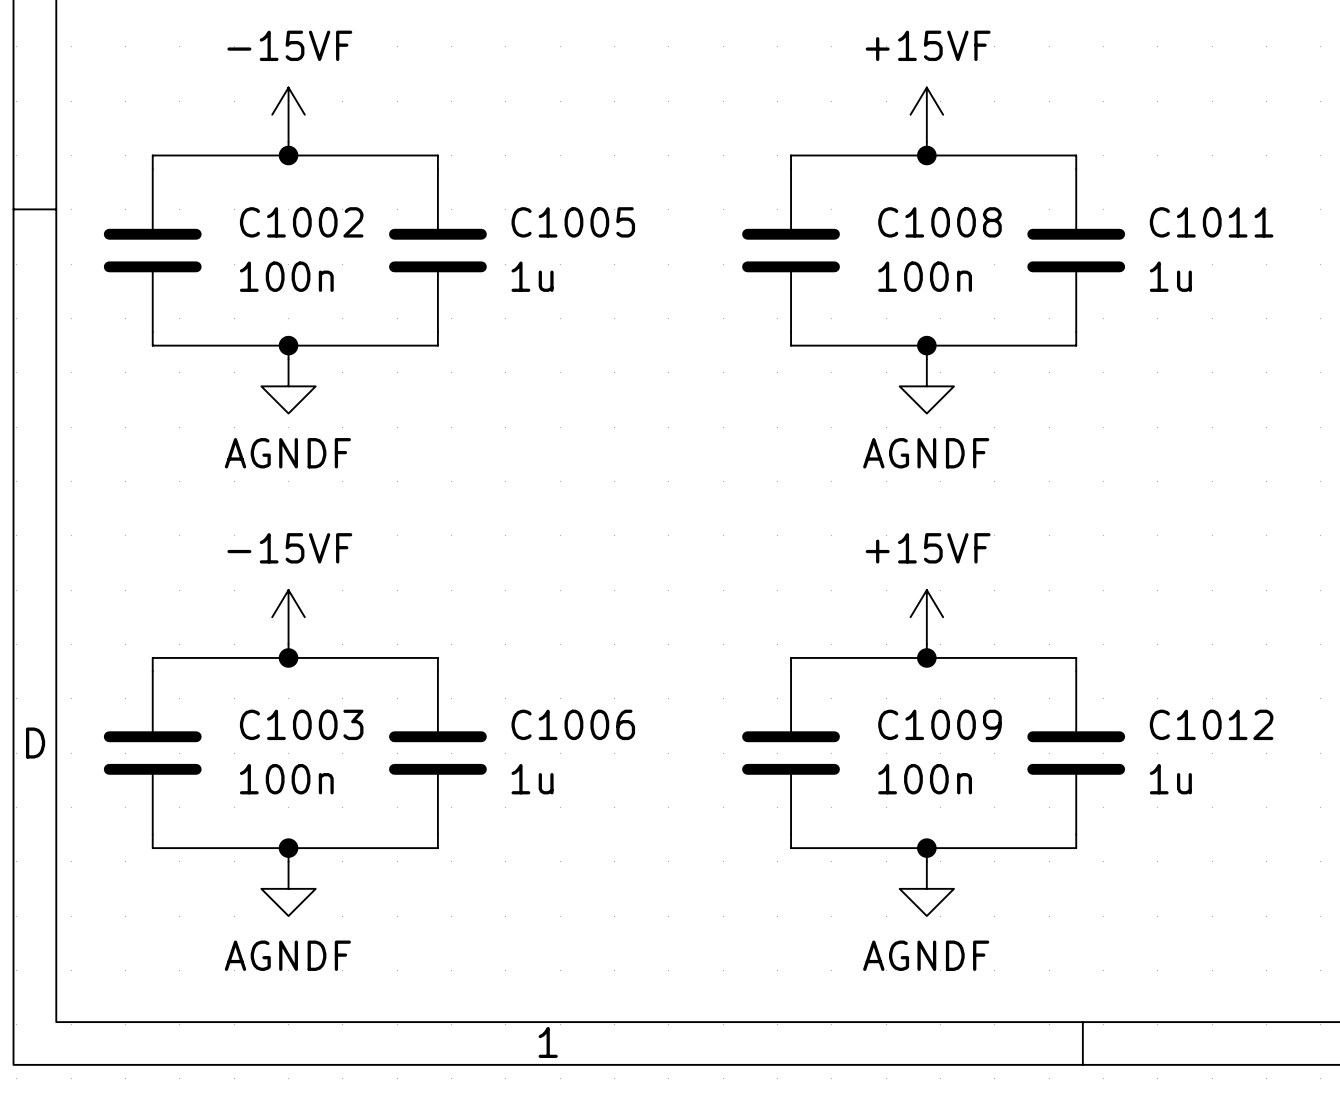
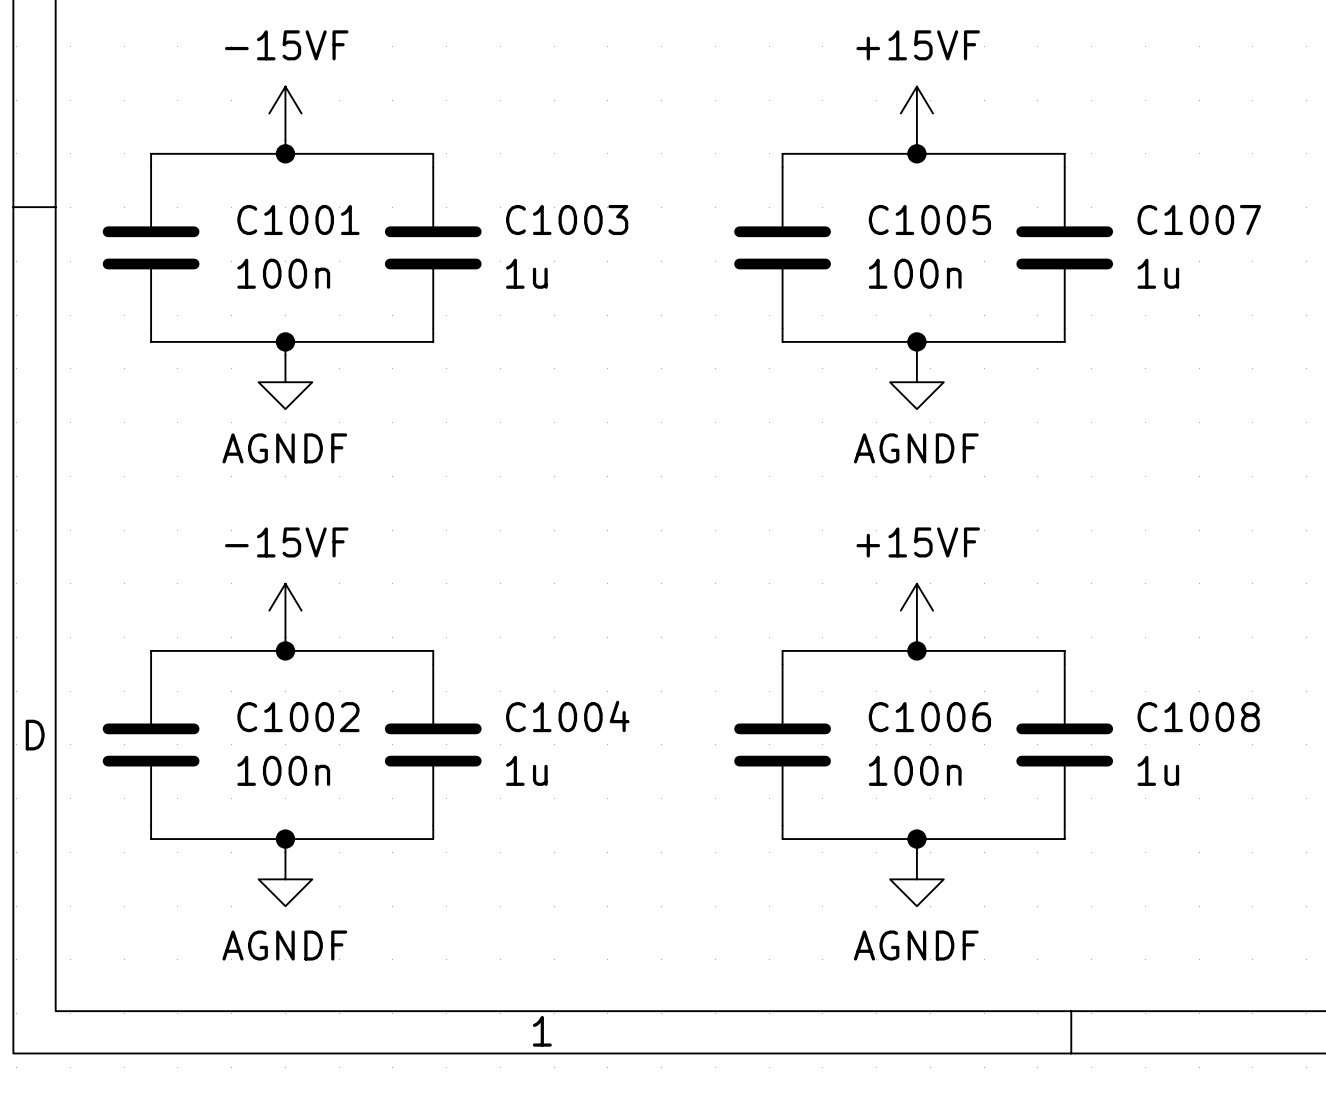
C1002 name: C1002 (301, 222) -> C1001 (298, 220)
C1005 name: C1005 (573, 222) -> C1003 (567, 220)
C1008 name: C1008 (939, 222) -> C1005 (929, 220)
C1011 name: C1011 (1211, 222) -> C1007 (1199, 220)
C1003 name: C1003 (301, 724) -> C1002 (298, 717)
C1006 name: C1006 (573, 724) -> C1004 (567, 716)
C1009 name: C1009 (939, 724) -> C1006 (929, 717)
C1012 name: C1012 (1211, 724) -> C1008 (1198, 717)

